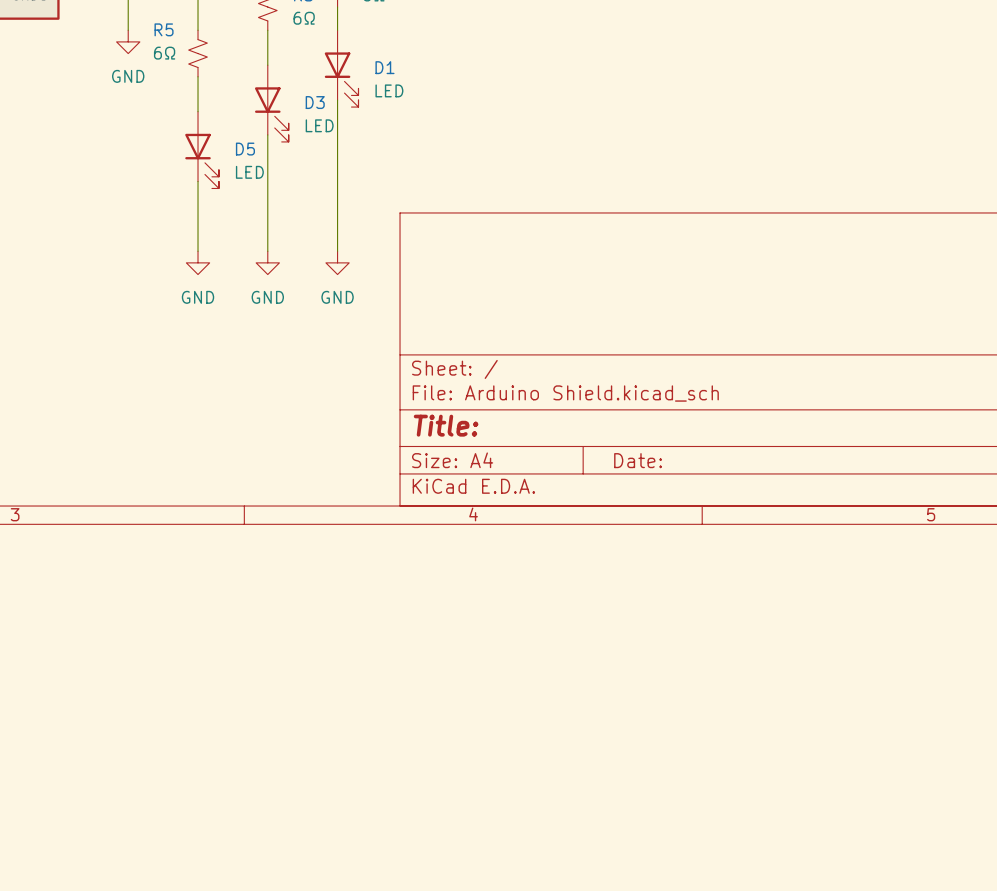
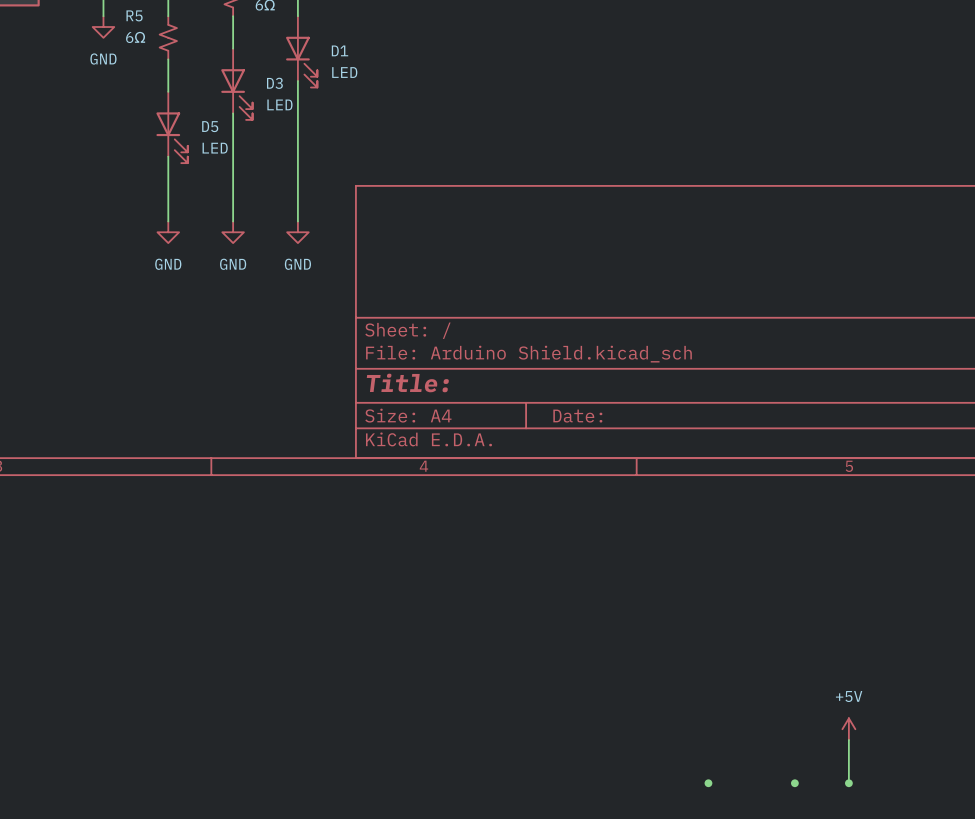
power symbol: none -> +5V (848, 729)
wire: none -> (848, 740) (848, 783)
junction: none -> (708, 783)
junction: none -> (794, 783)
junction: none -> (848, 783)

